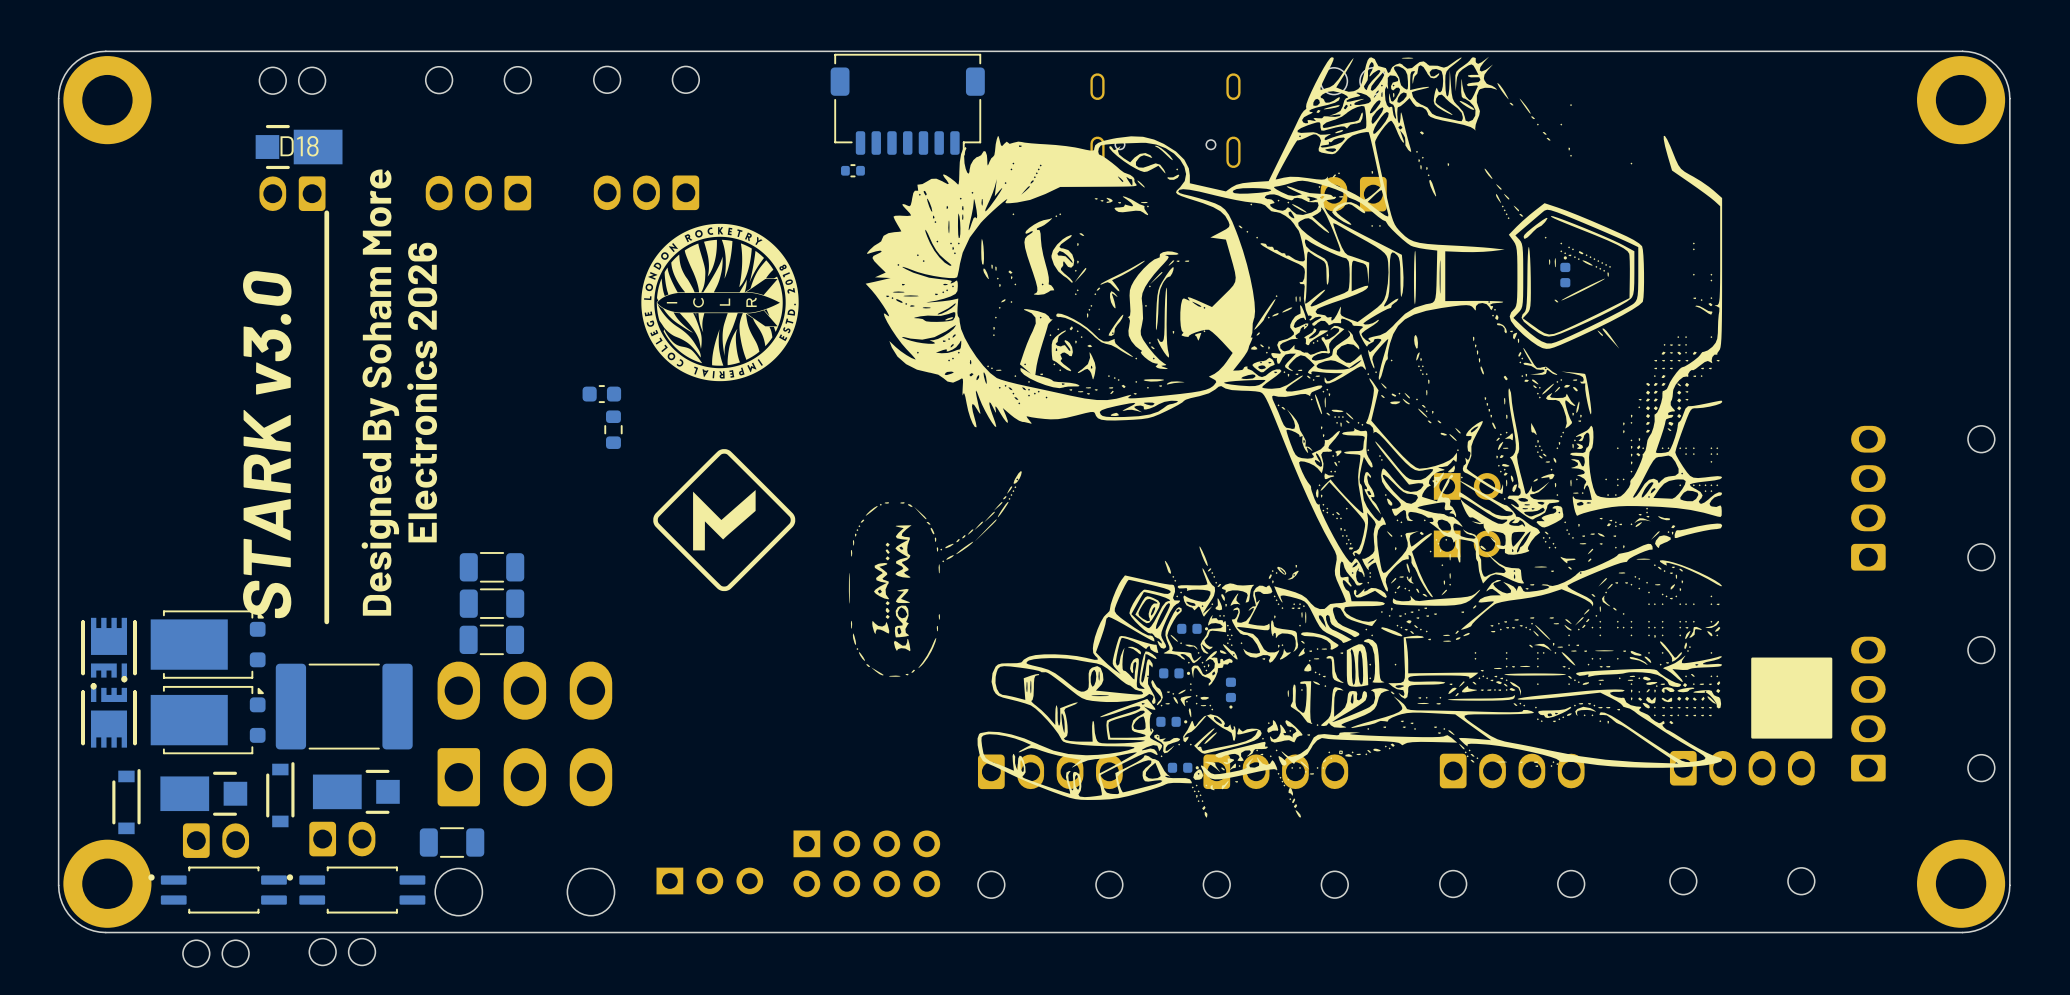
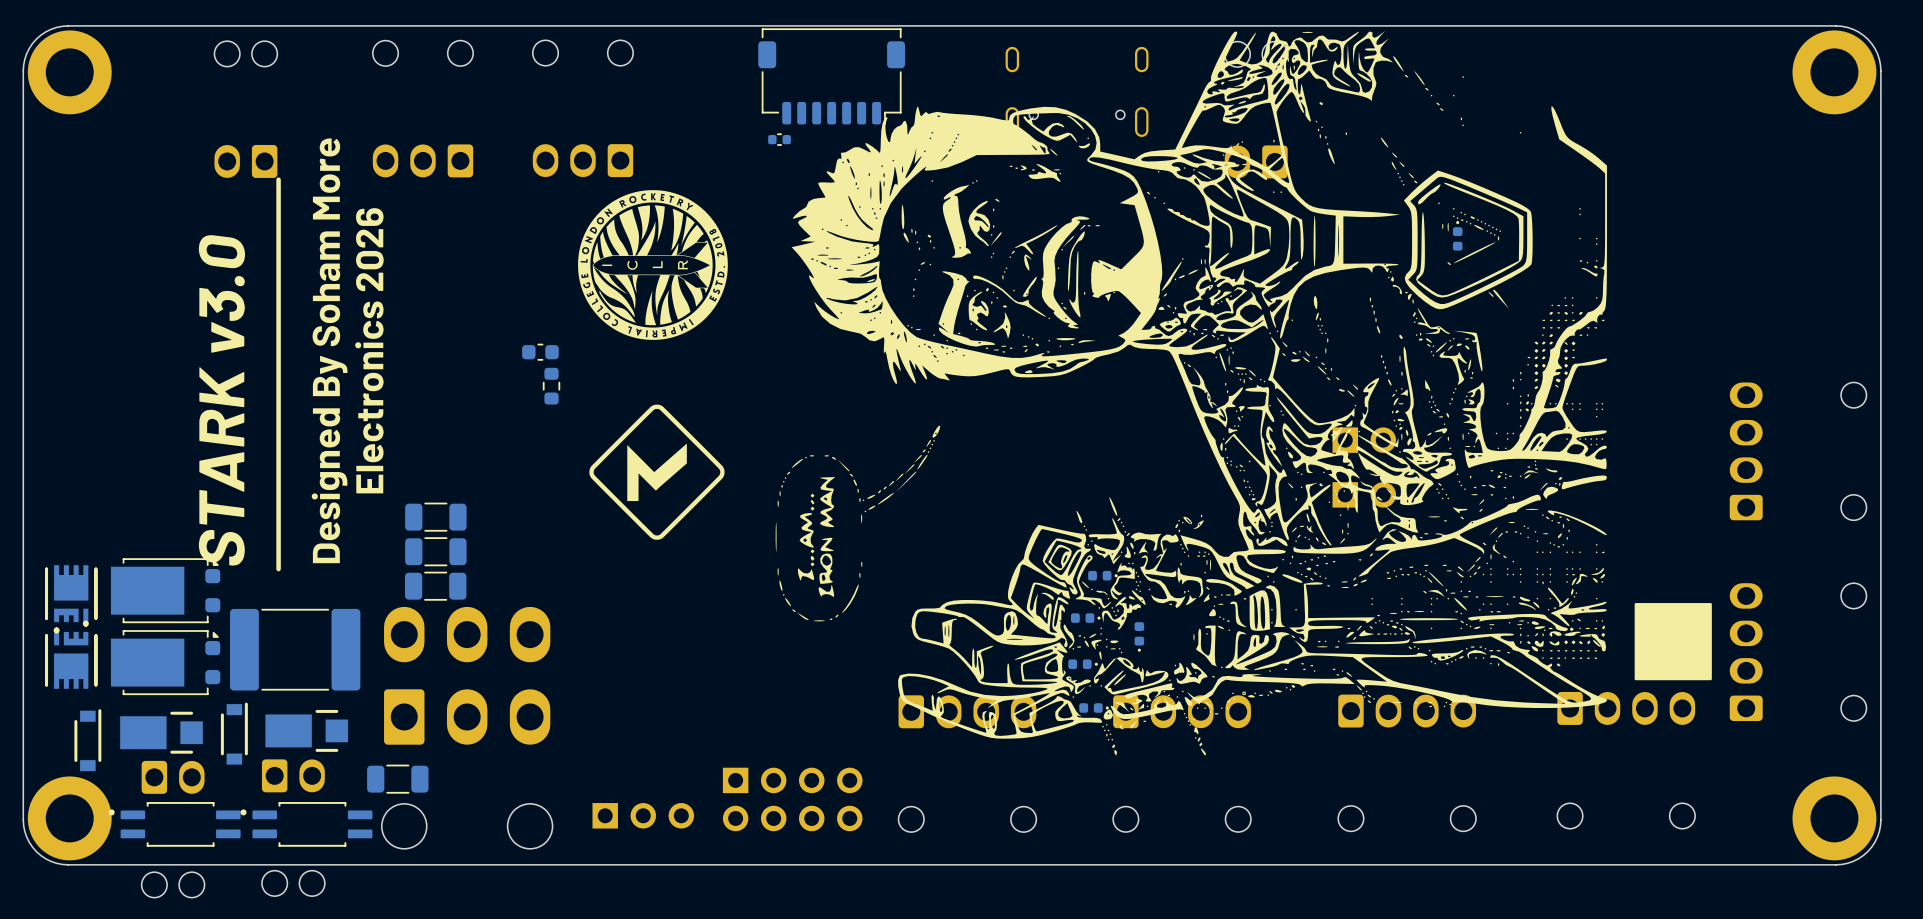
D18: (299, 147) -> none

